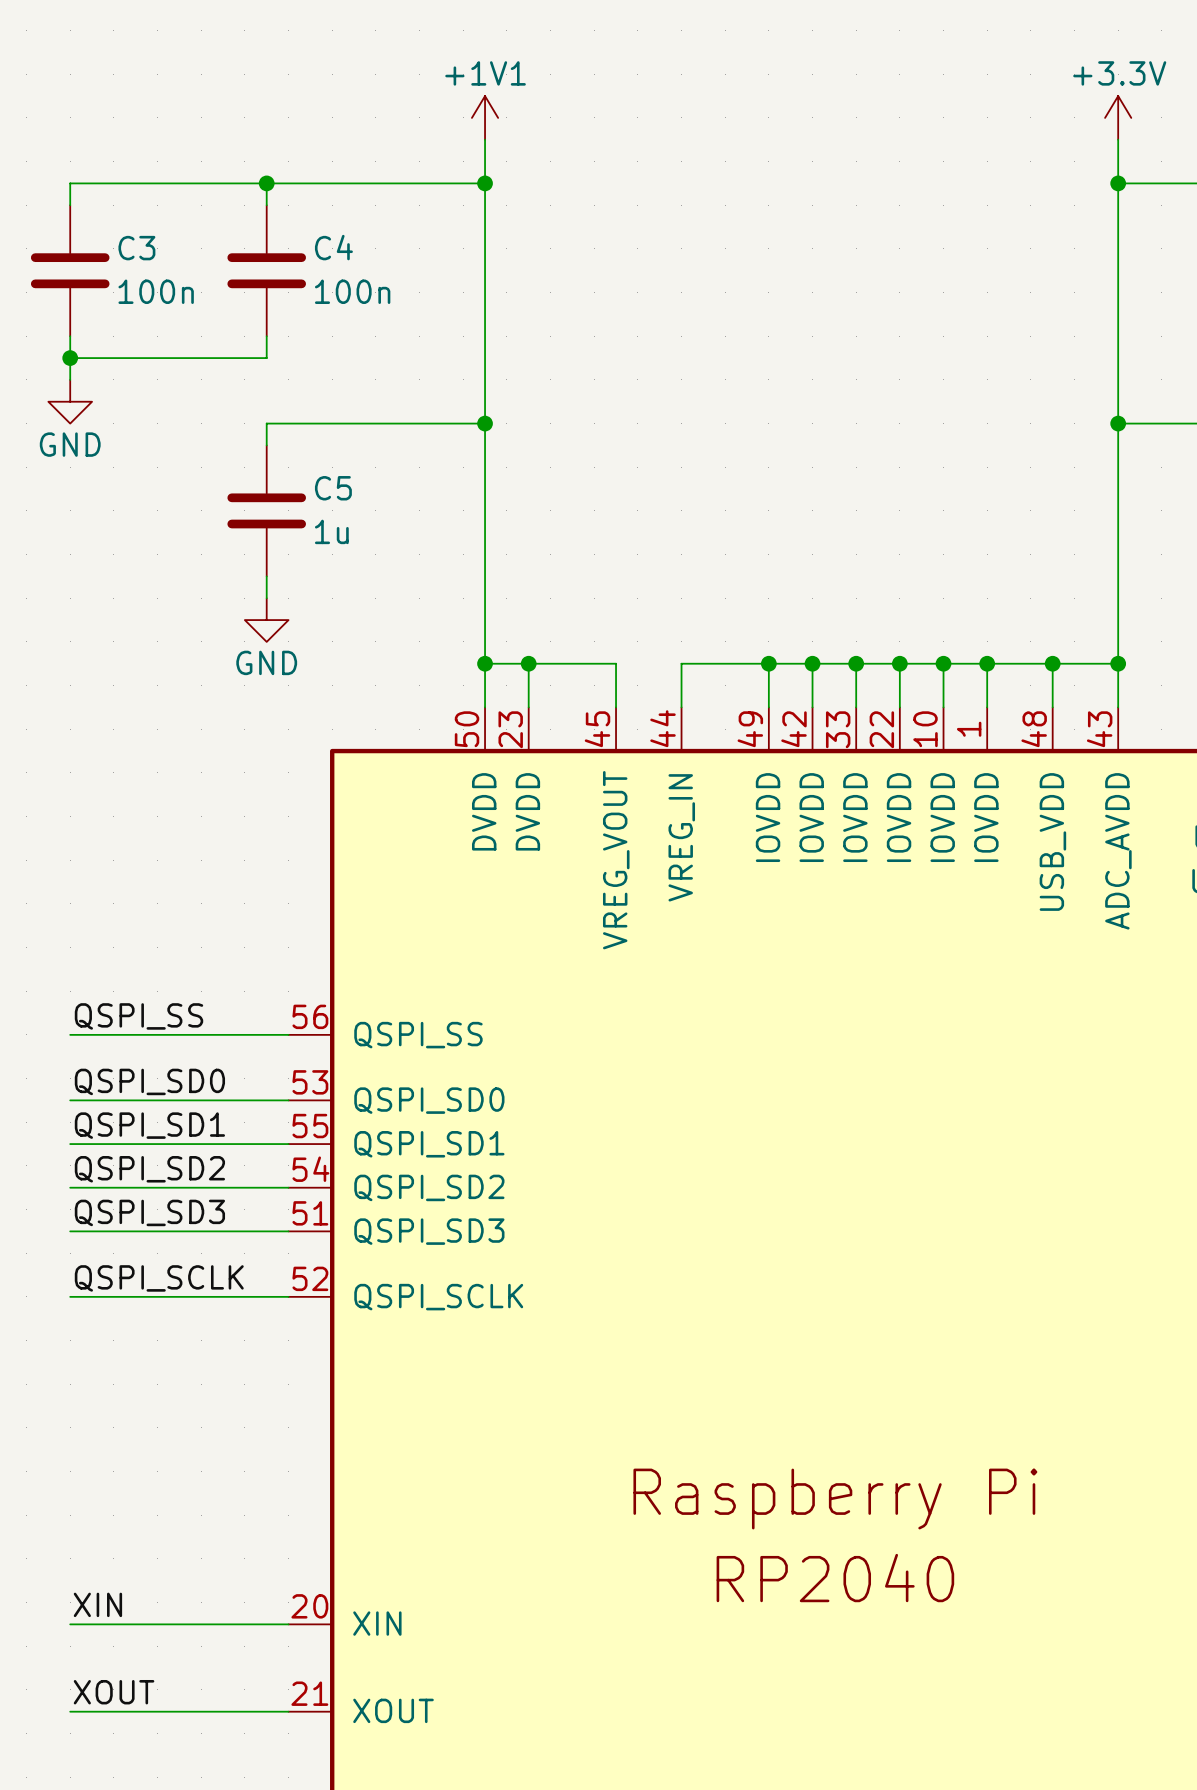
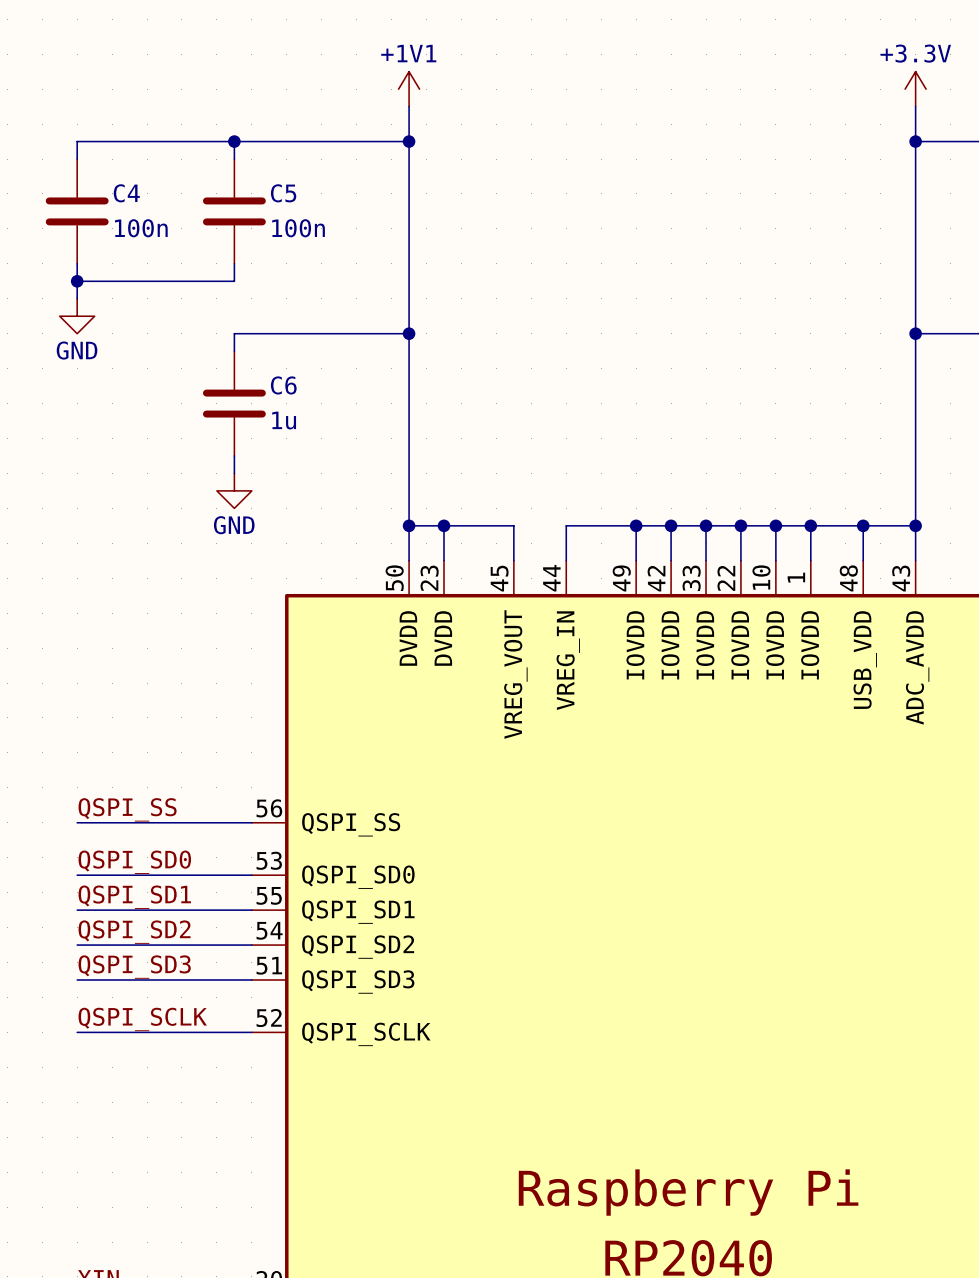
C4 name: C4 (333, 247) -> C5 (283, 193)
C3 name: C3 (136, 248) -> C4 (126, 193)
C5 name: C5 (333, 488) -> C6 (283, 385)

